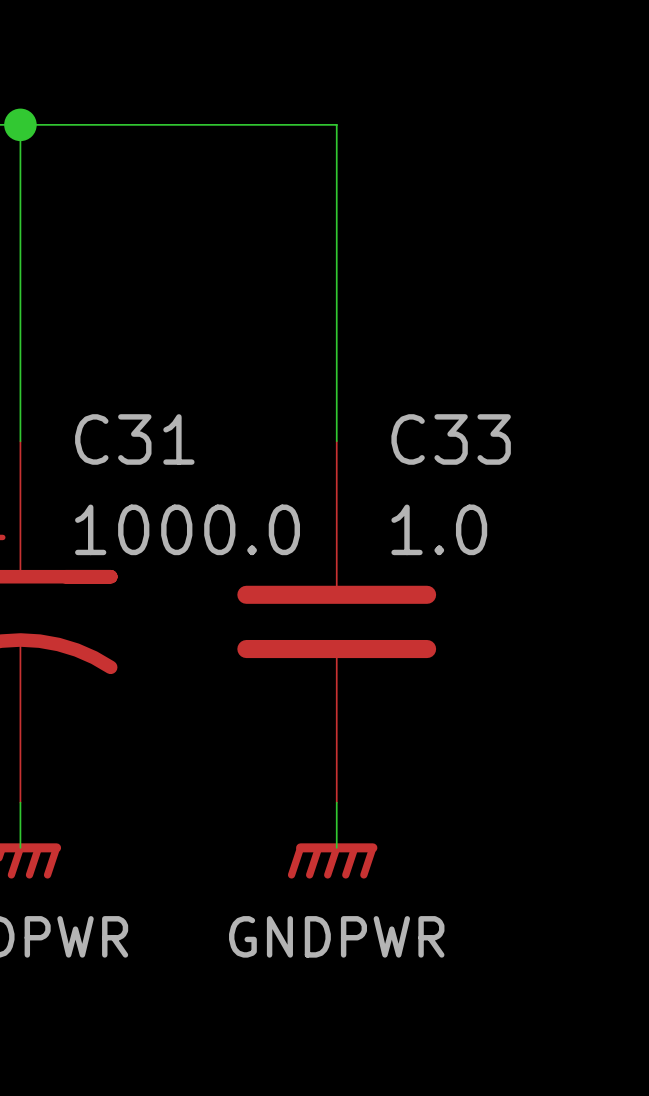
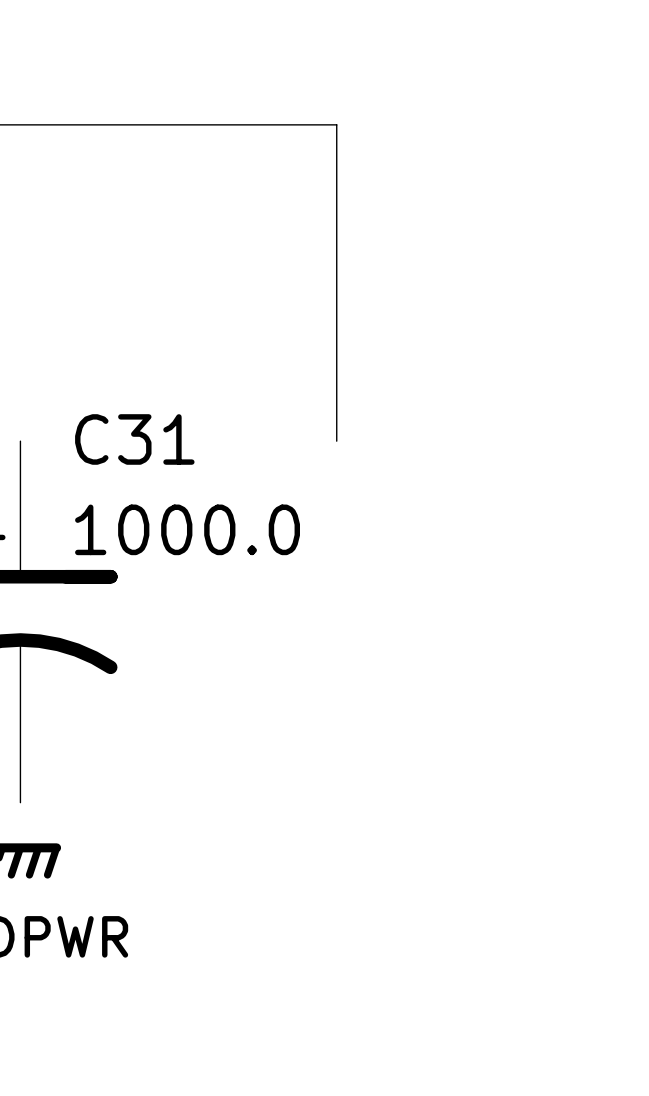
wire: (20, 124) (20, 441) -> none
junction: (20, 124) -> none
C33: 1.0 (336, 621) -> none
wire: (20, 802) (20, 847) -> none
wire: (336, 802) (336, 847) -> none
power symbol: GNDPWR (332, 860) -> none

